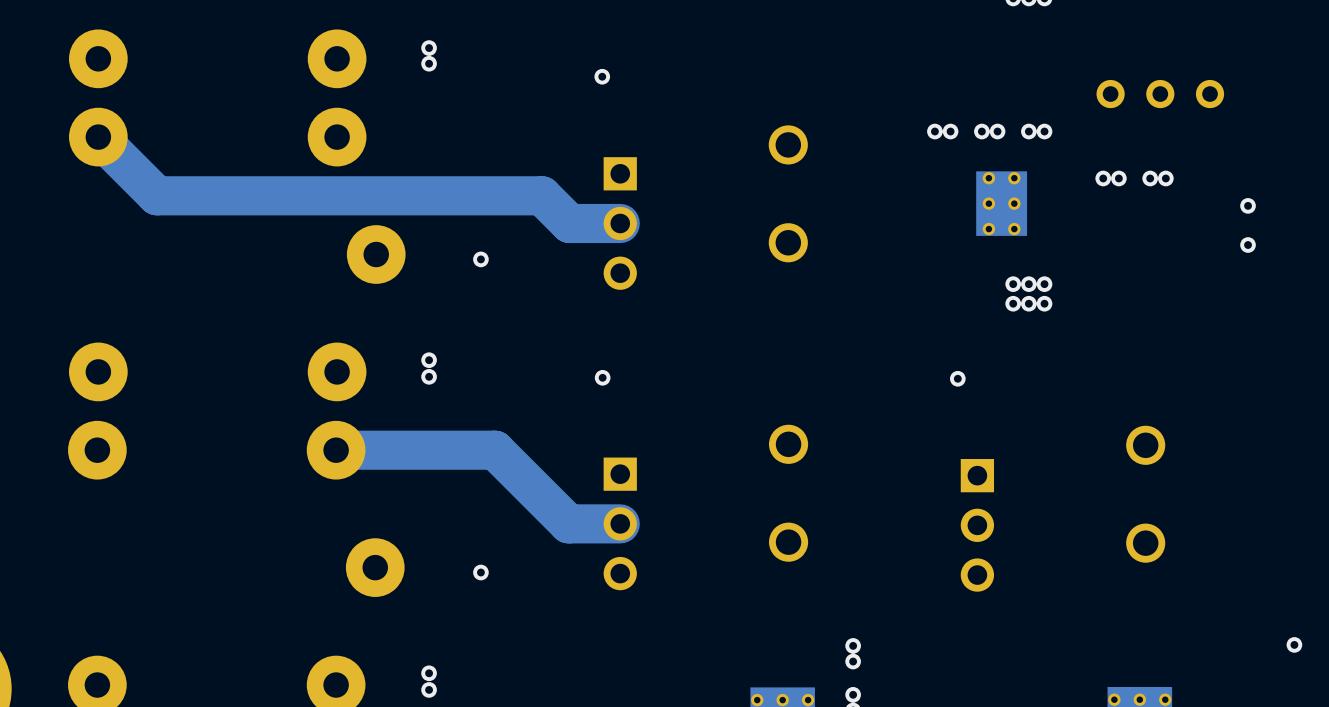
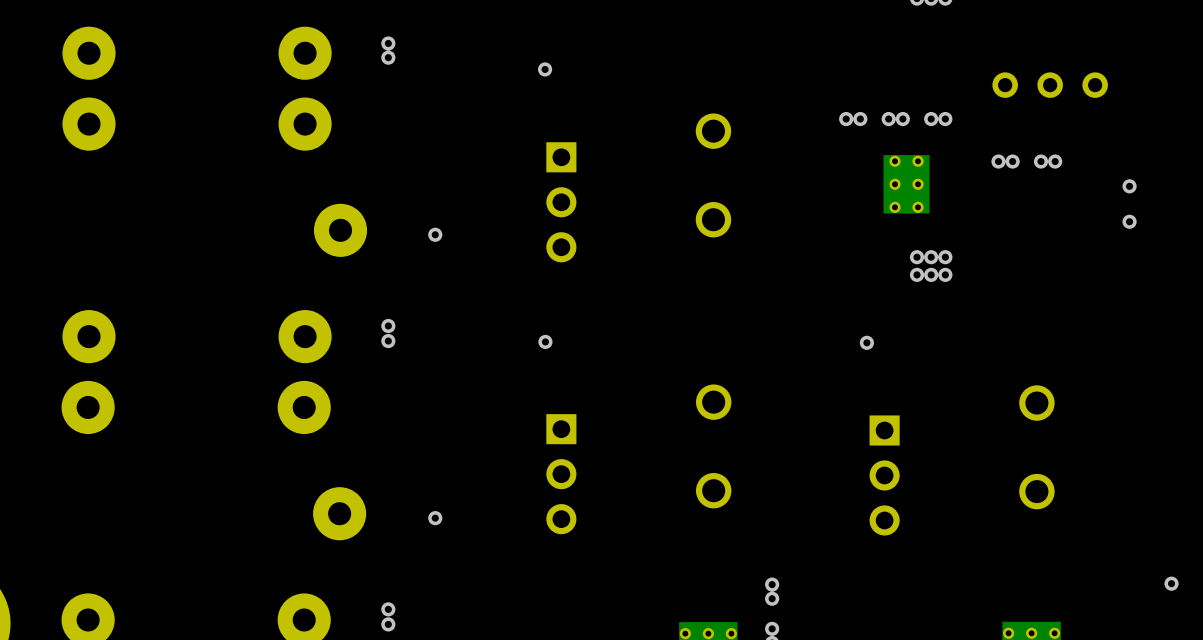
track: (98, 137) (157, 195) (541, 195) (569, 223) (620, 223) -> none
track: (336, 450) (495, 450) (568, 523) (620, 523) -> none

